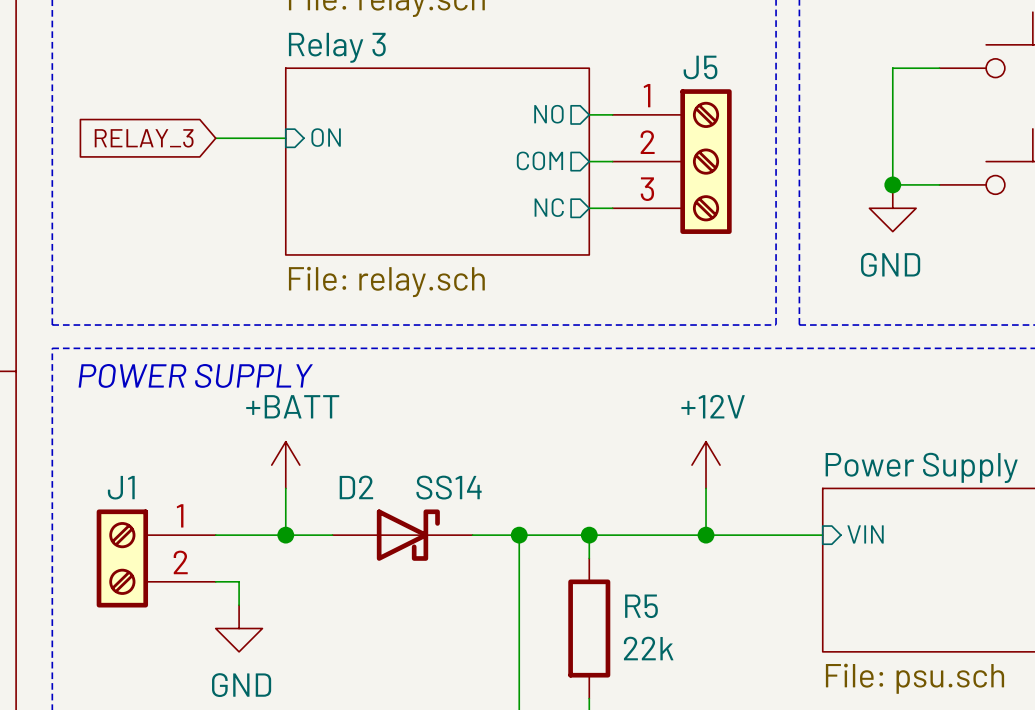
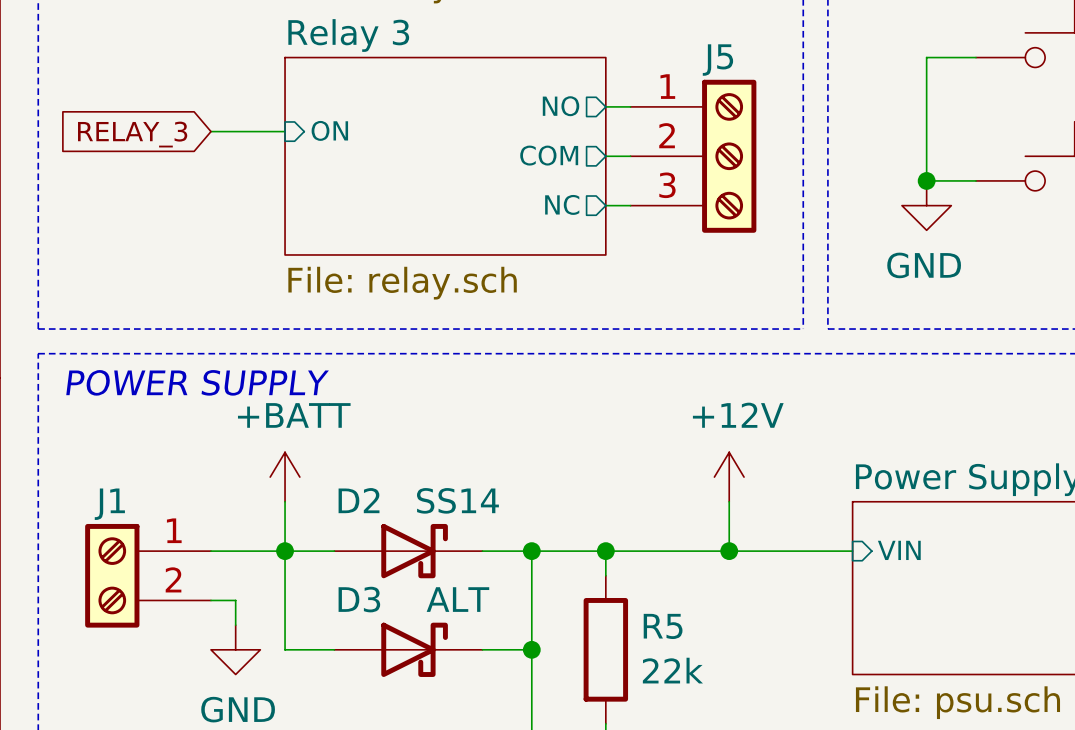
wire: none -> (285, 551) (285, 649) (334, 649)
D3: none -> ALT (408, 649)
wire: none -> (482, 649) (531, 649)
junction: none -> (531, 649)

